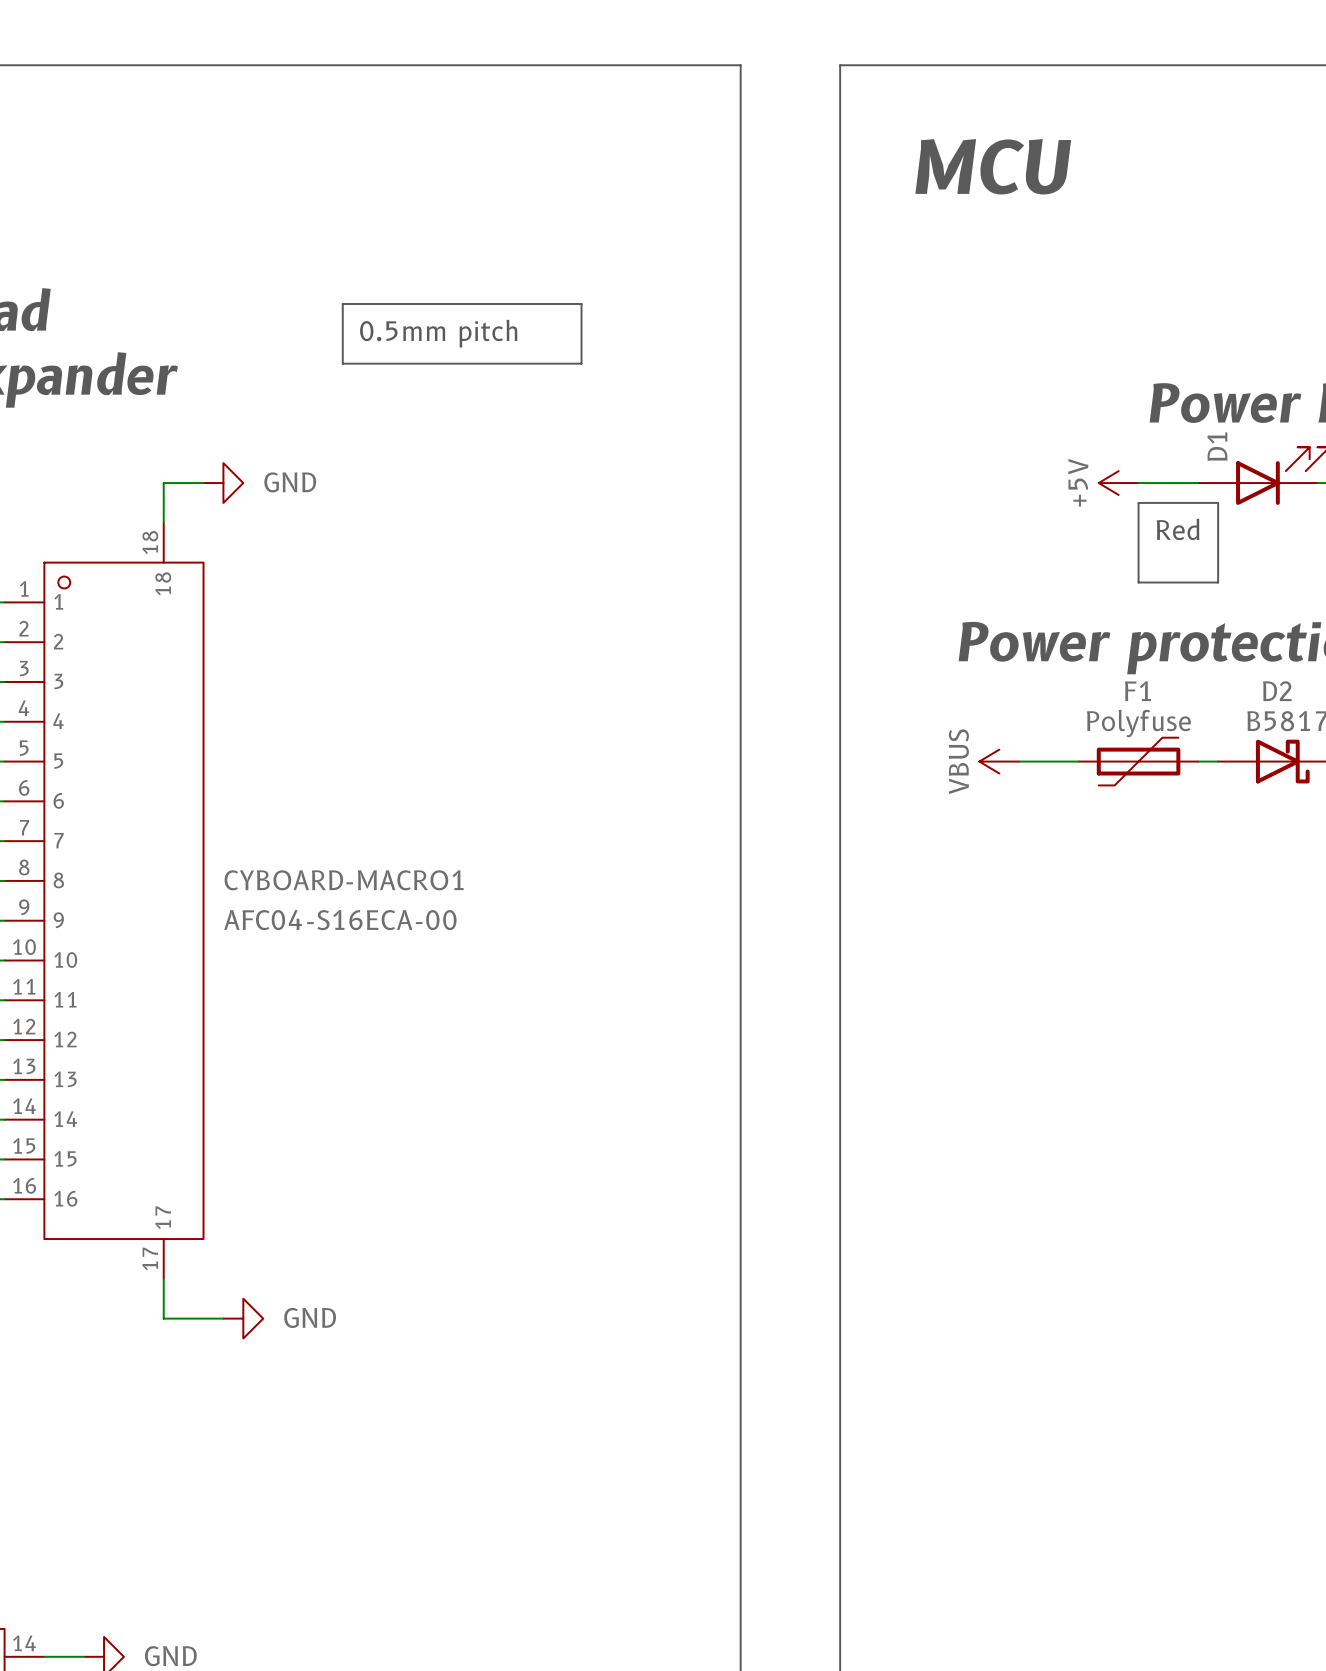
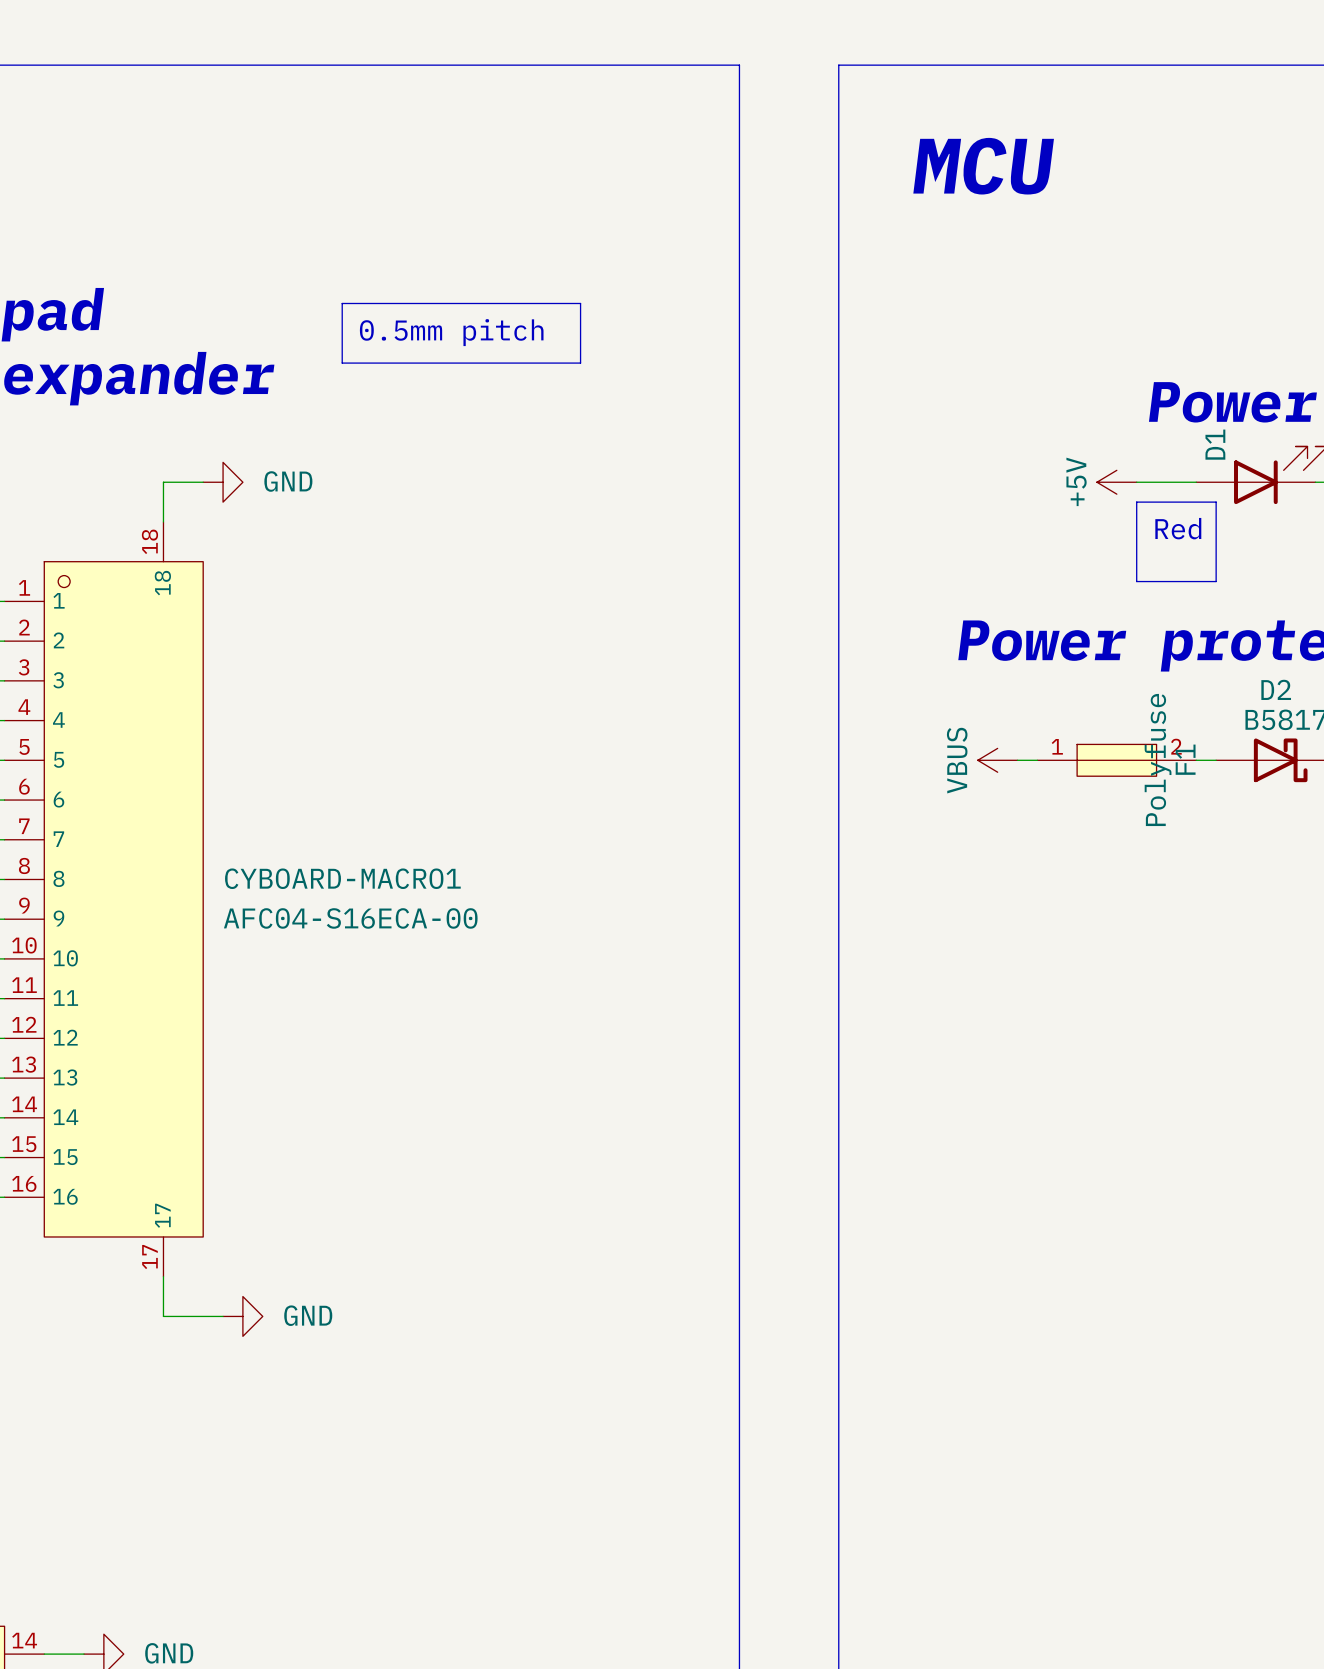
F1 name position: F1 (1137, 691) -> F1 (1185, 759)
F1 value position: Polyfuse (1138, 723) -> Polyfuse (1158, 759)
F1 symbol: [1078, 737, 1199, 786] -> [1037, 744, 1197, 777]

